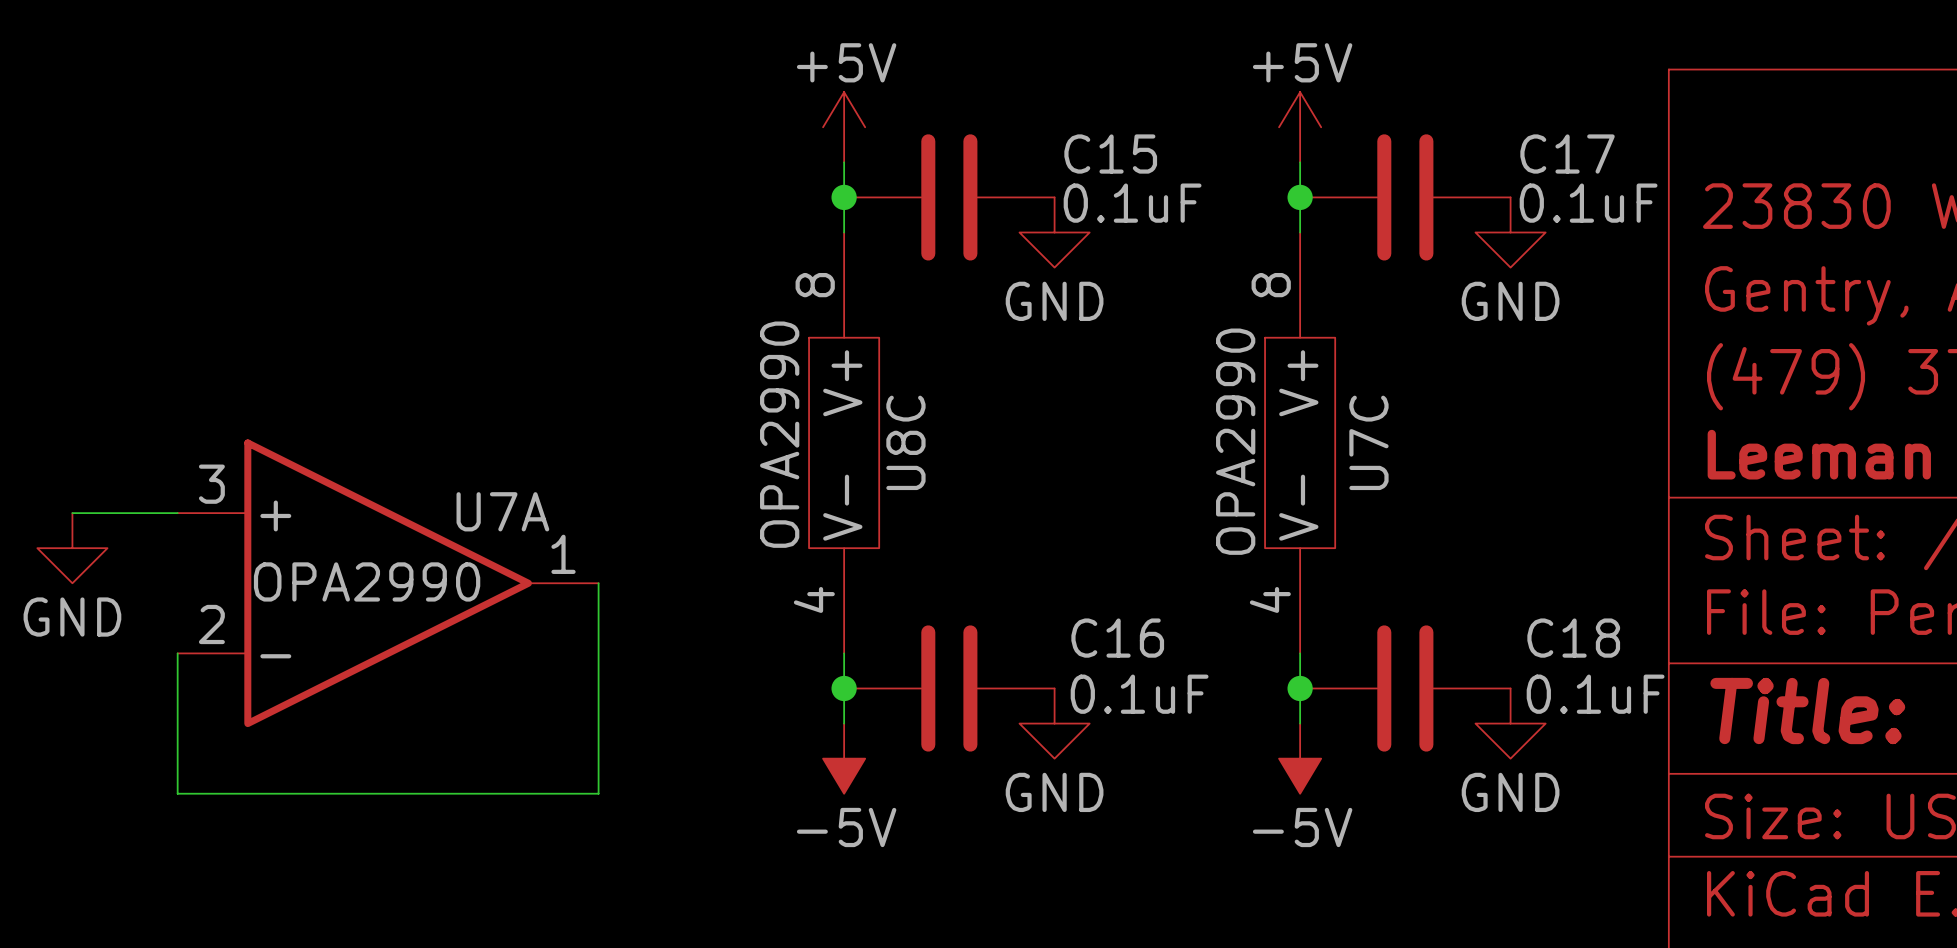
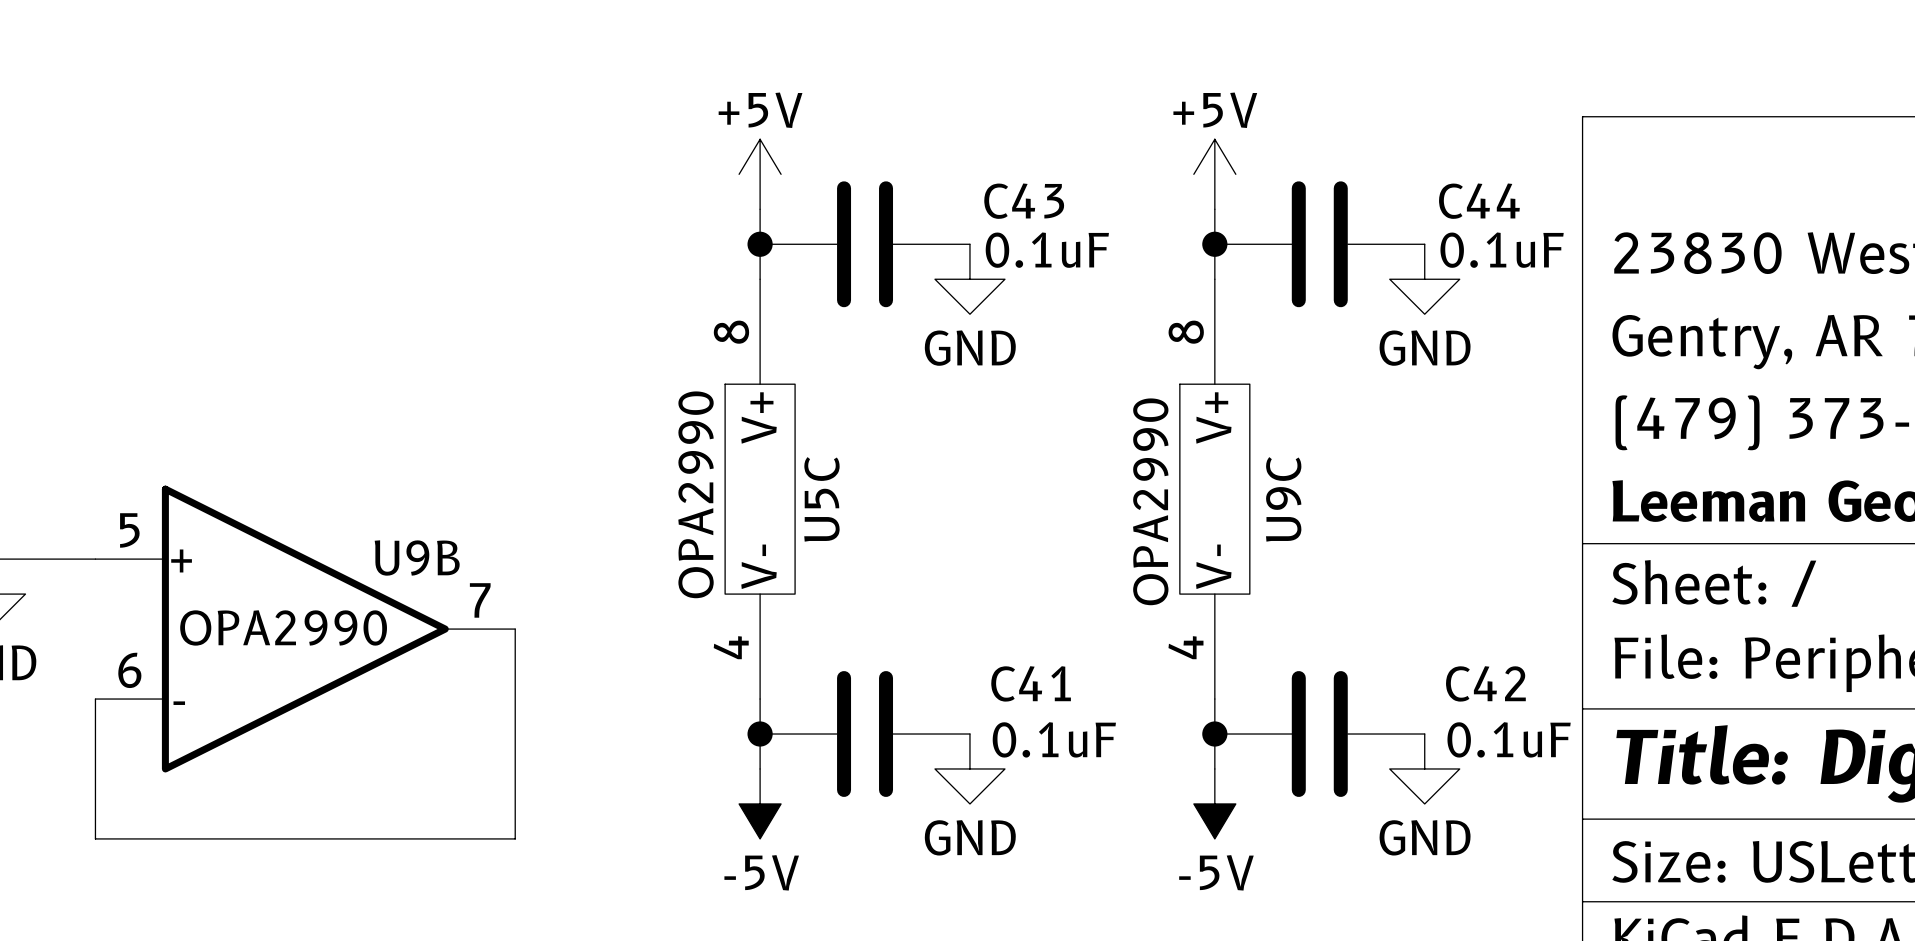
C15 name: C15 (1110, 154) -> C43 (1024, 201)
C17 name: C17 (1567, 154) -> C44 (1479, 201)
U8C name: U8C (905, 442) -> U5C (821, 499)
U7C name: U7C (1368, 442) -> U9C (1283, 499)
U7A pin number: 3 (211, 484) -> 5 (129, 530)
U7A name: U7A (502, 511) -> U9B (417, 557)
U7A pin number: 1 (563, 554) -> 7 (480, 600)
U7A pin number: 2 (211, 624) -> 6 (129, 670)
C16 name: C16 (1117, 638) -> C41 (1031, 683)
C18 name: C18 (1573, 638) -> C42 (1485, 683)

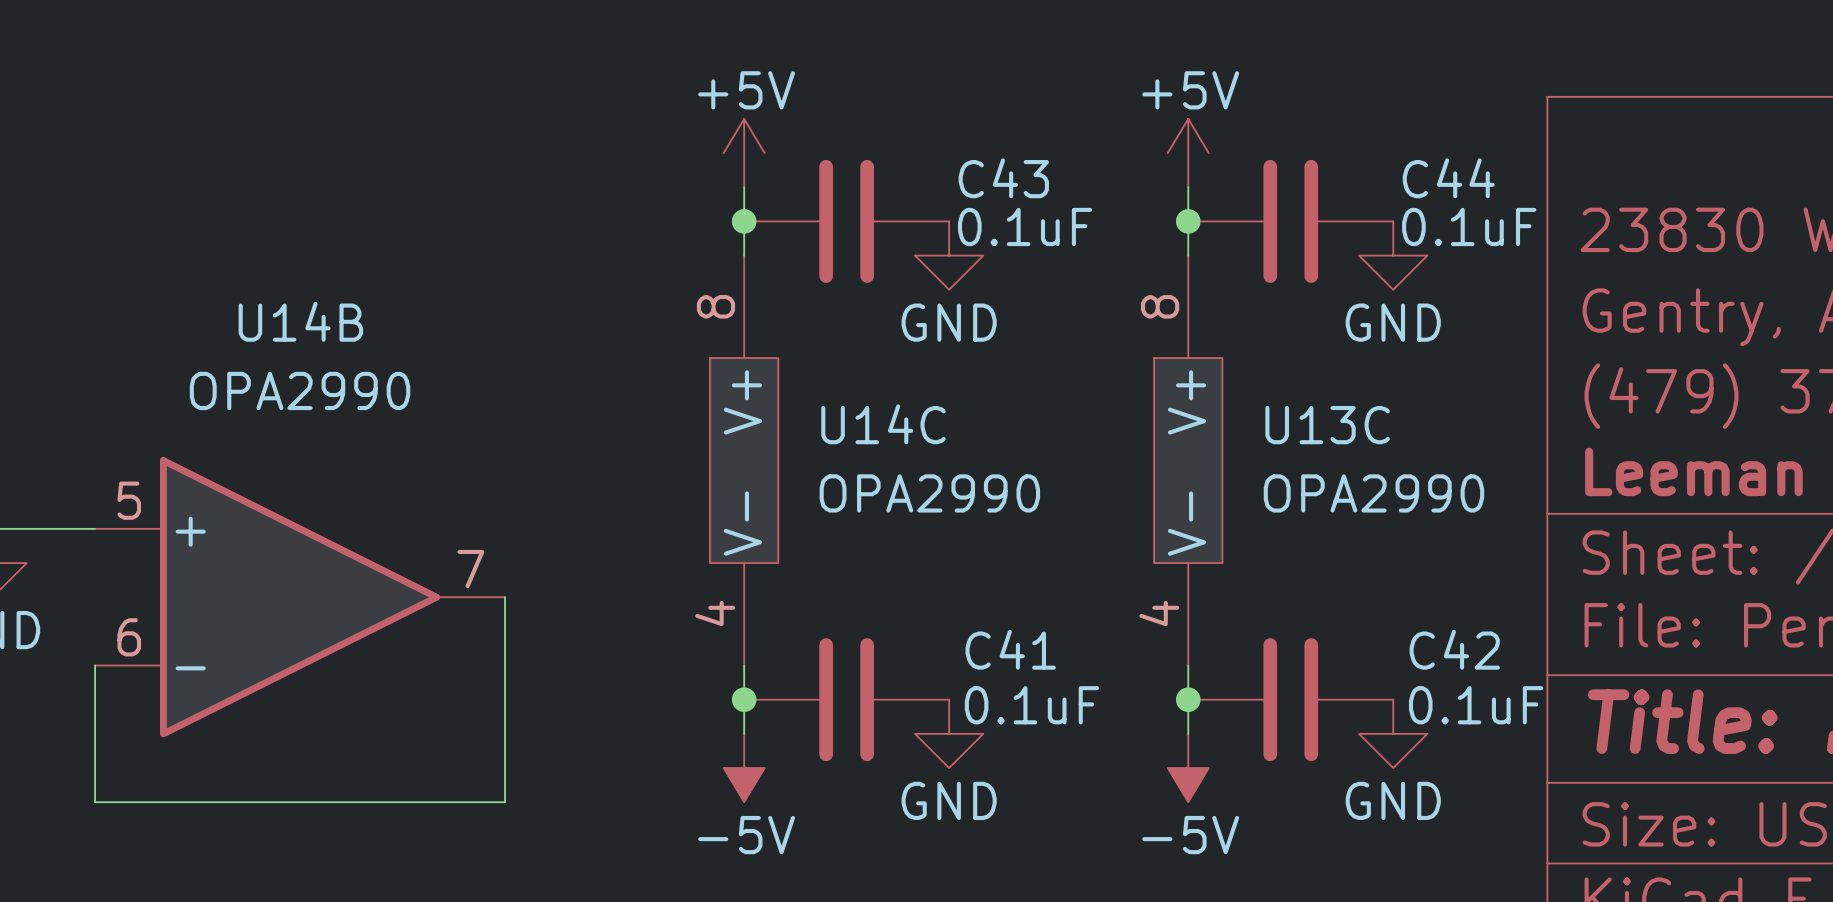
U5C text rotation: 0° (696, 494) -> 90° clockwise (929, 493)
U5C text position: OPA2990 (696, 494) -> OPA2990 (929, 493)
U5C name: U5C (821, 499) -> U14C (883, 424)
U9C name: U9C (1283, 499) -> U13C (1327, 425)
U9C text rotation: 0° (1150, 501) -> 90° clockwise (1373, 493)
U9C text position: OPA2990 (1150, 501) -> OPA2990 (1373, 493)
U9B name: U9B (417, 557) -> U14B (300, 321)
U9B text position: OPA2990 (283, 627) -> OPA2990 (300, 390)

